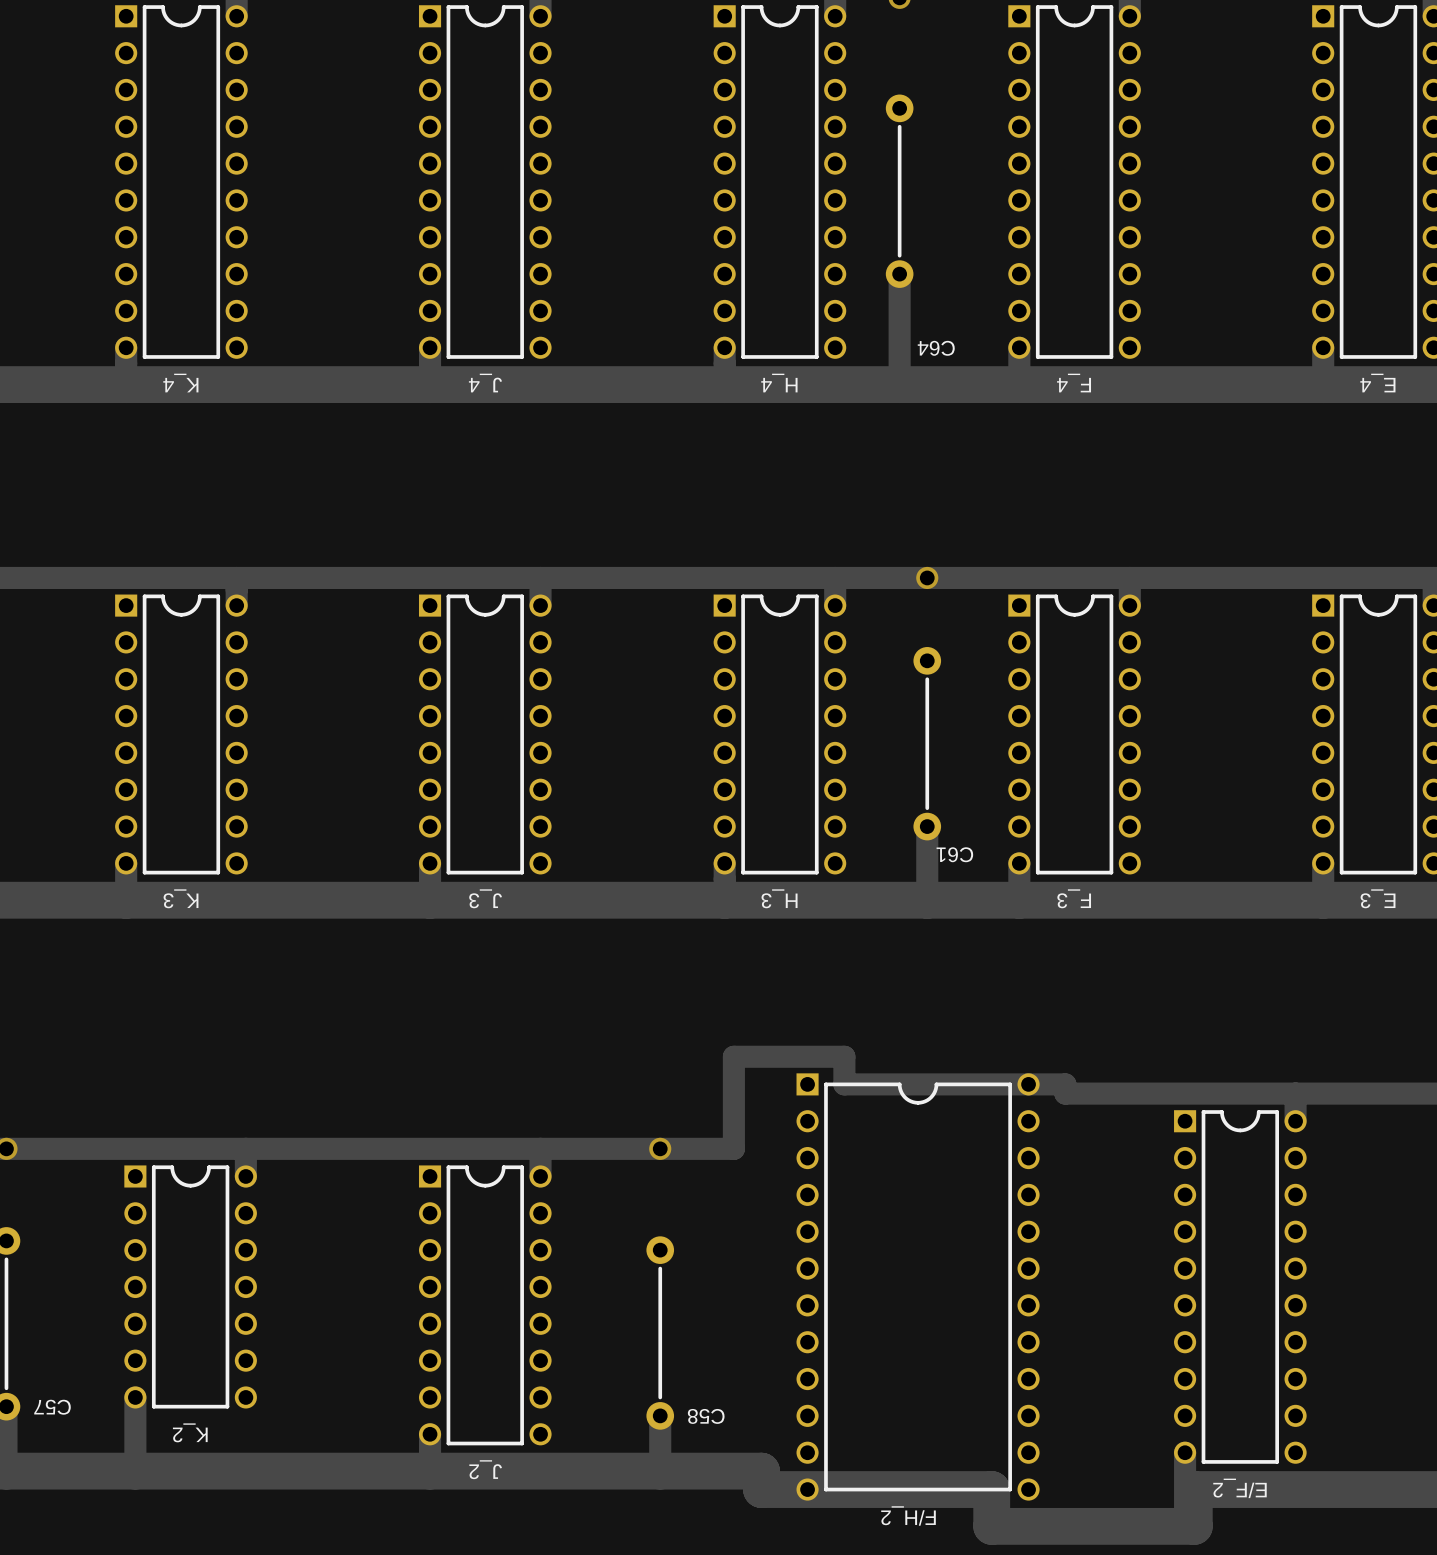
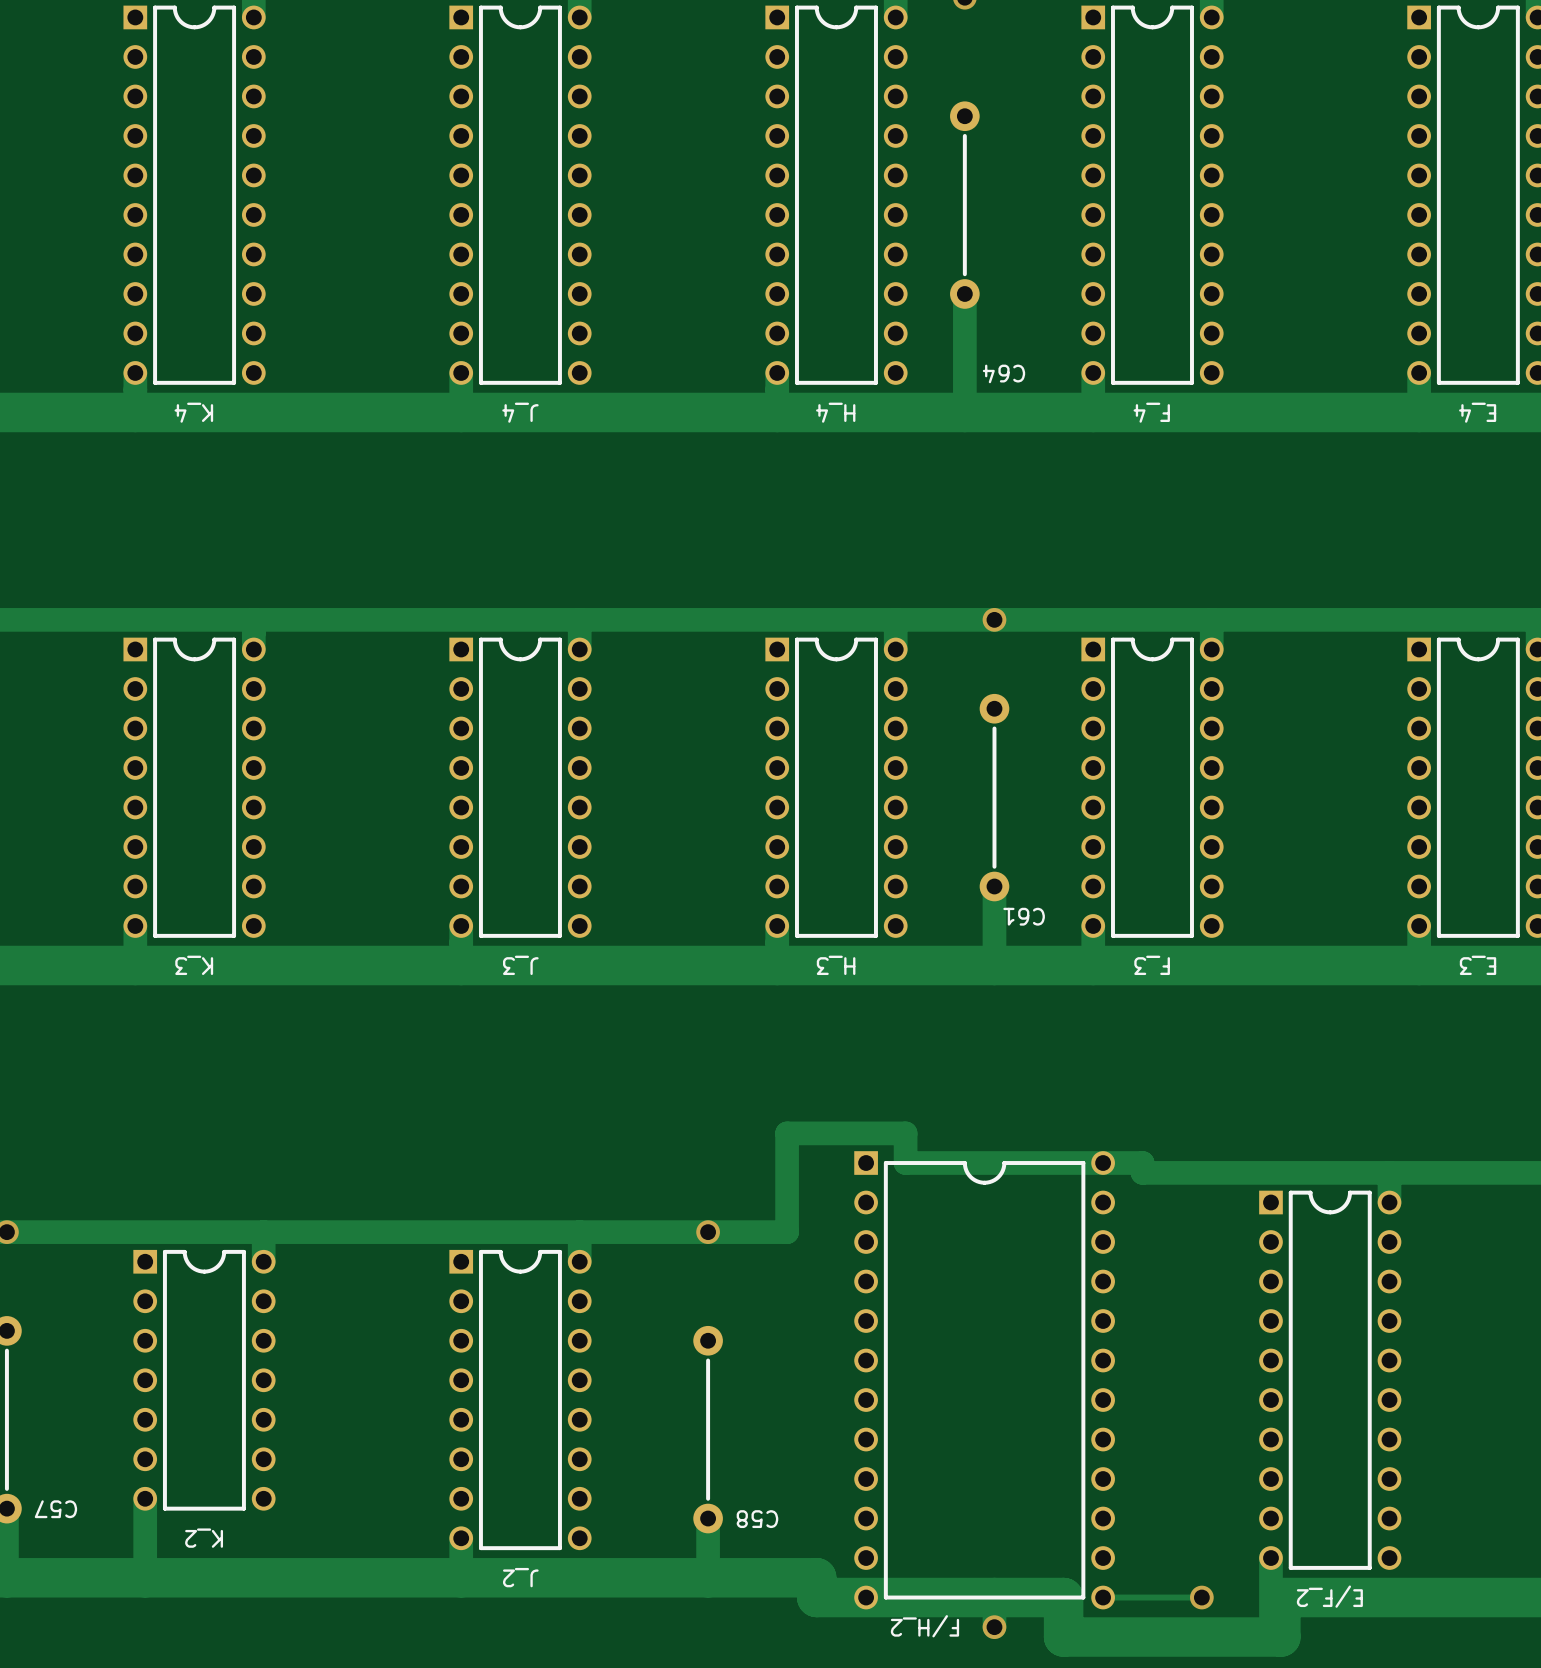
track: none -> (1103, 1597) (1201, 1597)
via: none -> (1201, 1597)
F/H_2 name position: F/H_2 (908, 1516) -> F/H_2 (924, 1626)
via: none -> (994, 1627)

